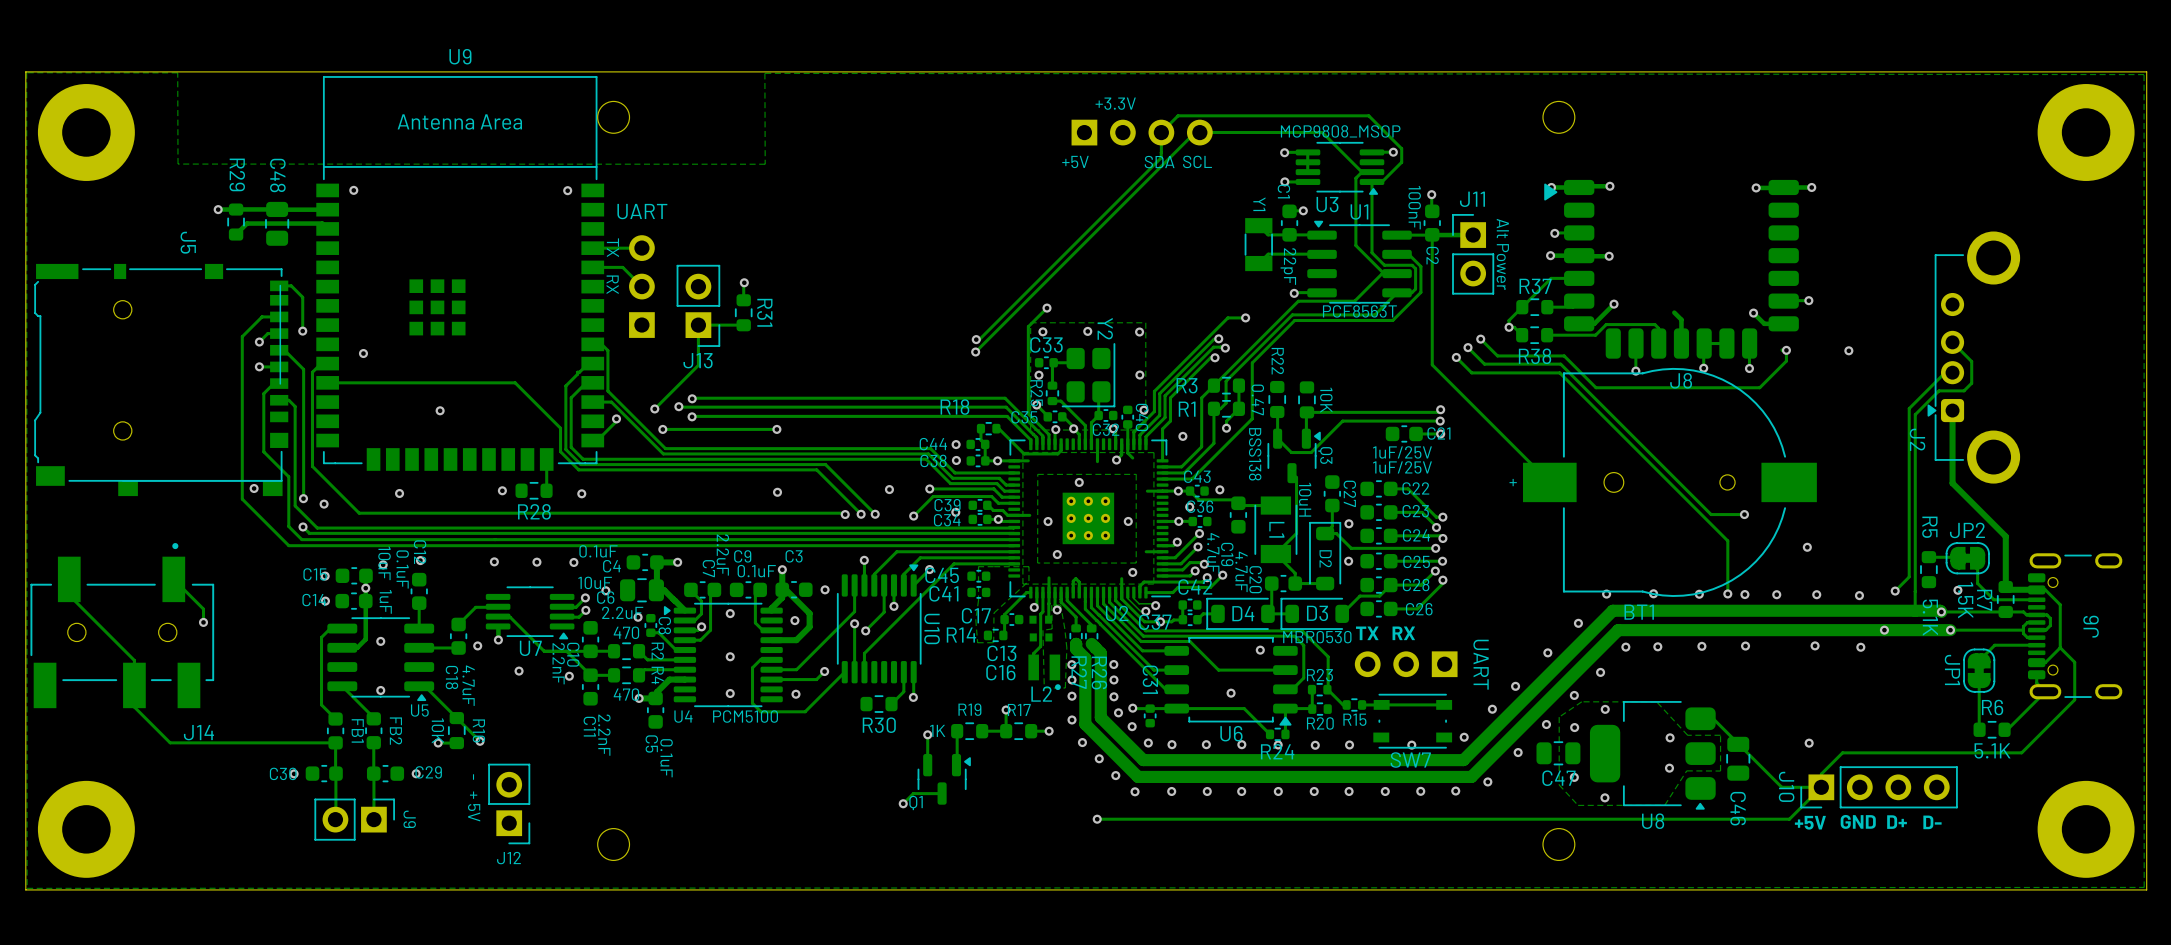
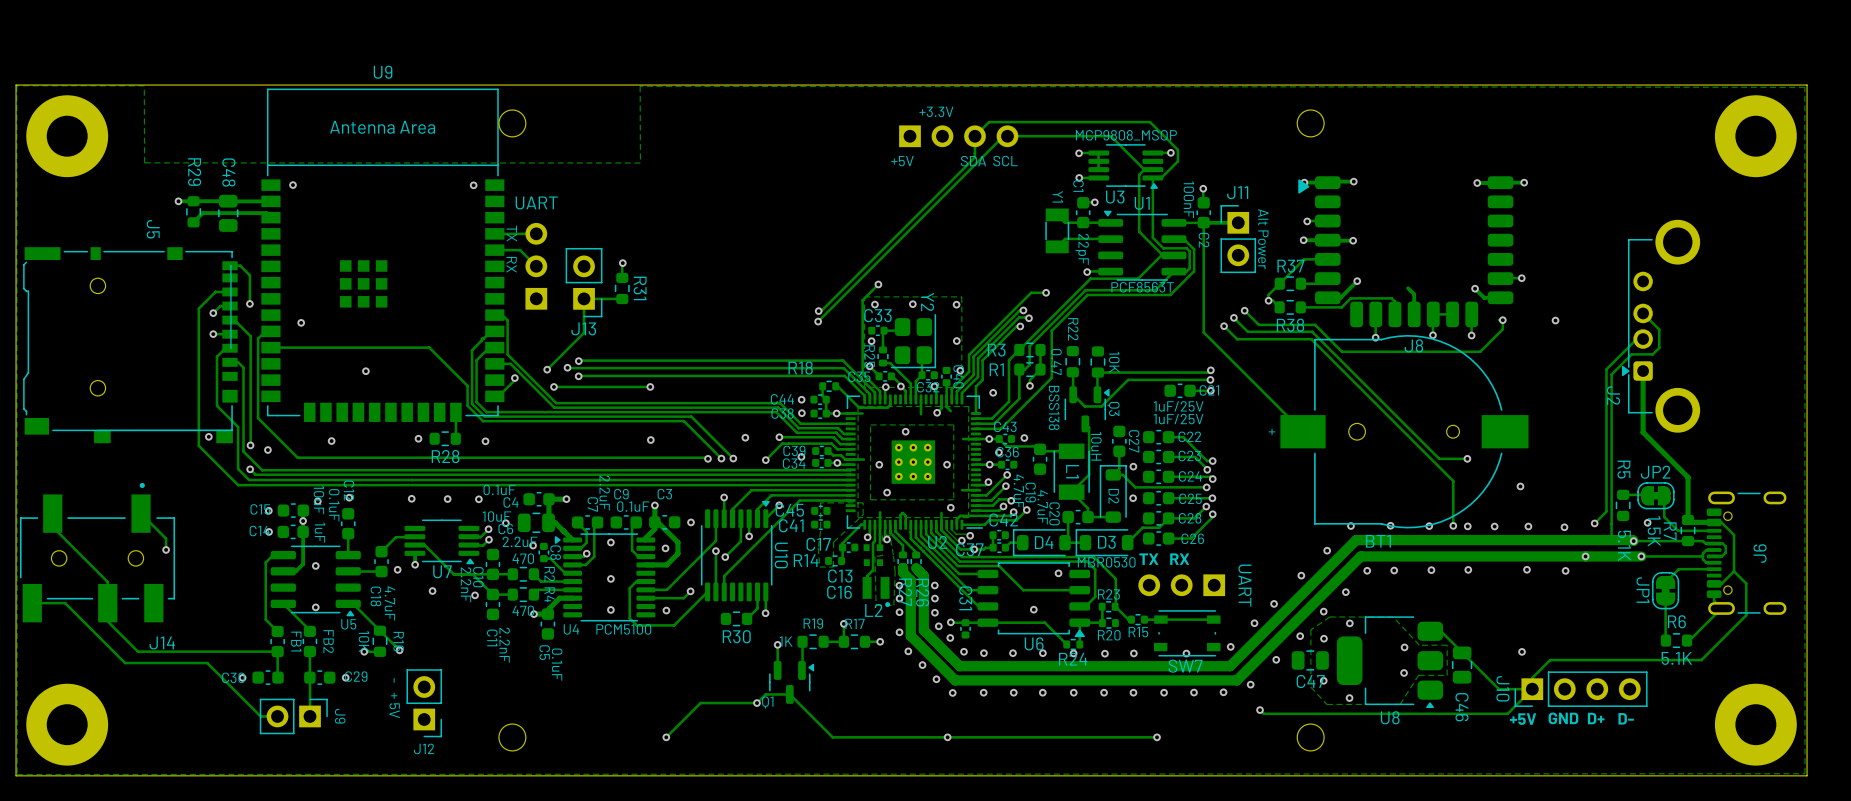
track: none -> (32, 603) (65, 603) (125, 663) (207, 663) (260, 716) (277, 716)
track: (335, 773) (335, 819) -> none
track: none -> (789, 694) (832, 737) (1157, 737)
track: none -> (756, 703) (700, 703) (666, 737)
via: none -> (1260, 710)
track: (1792, 816) (1789, 819) (1097, 819) -> (1507, 713) (1263, 713) (1260, 710)
via position: (1097, 819) -> (947, 737)
via: none -> (666, 737)
via: none -> (1157, 737)

